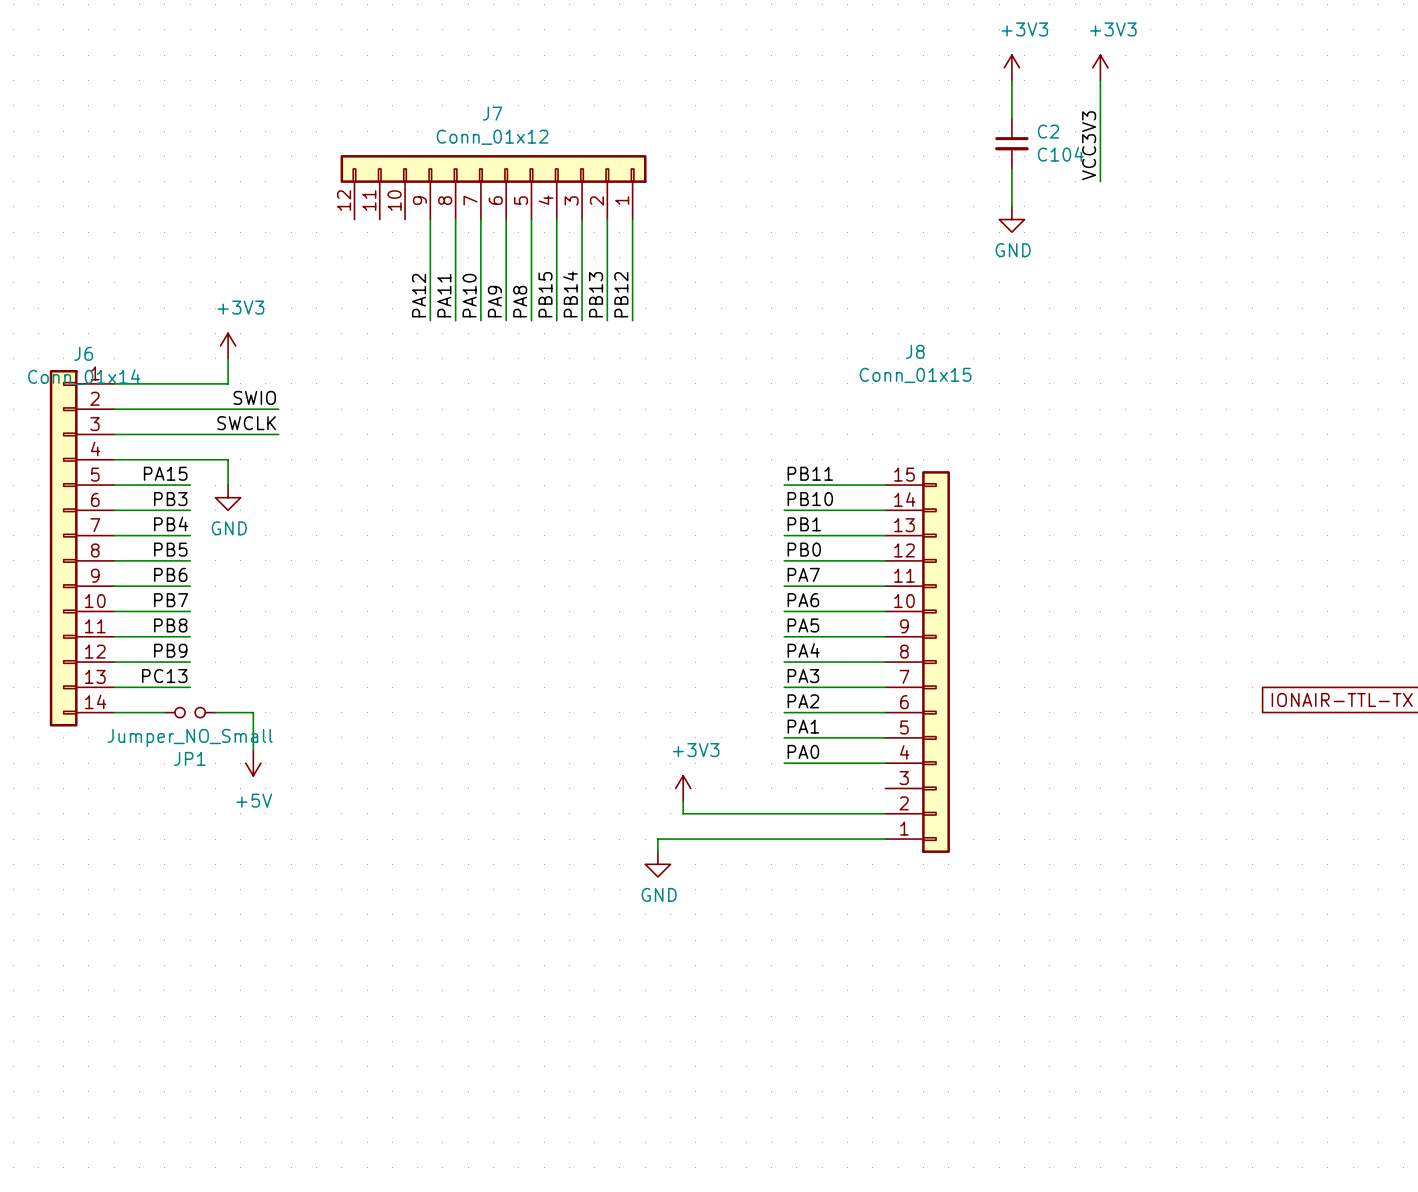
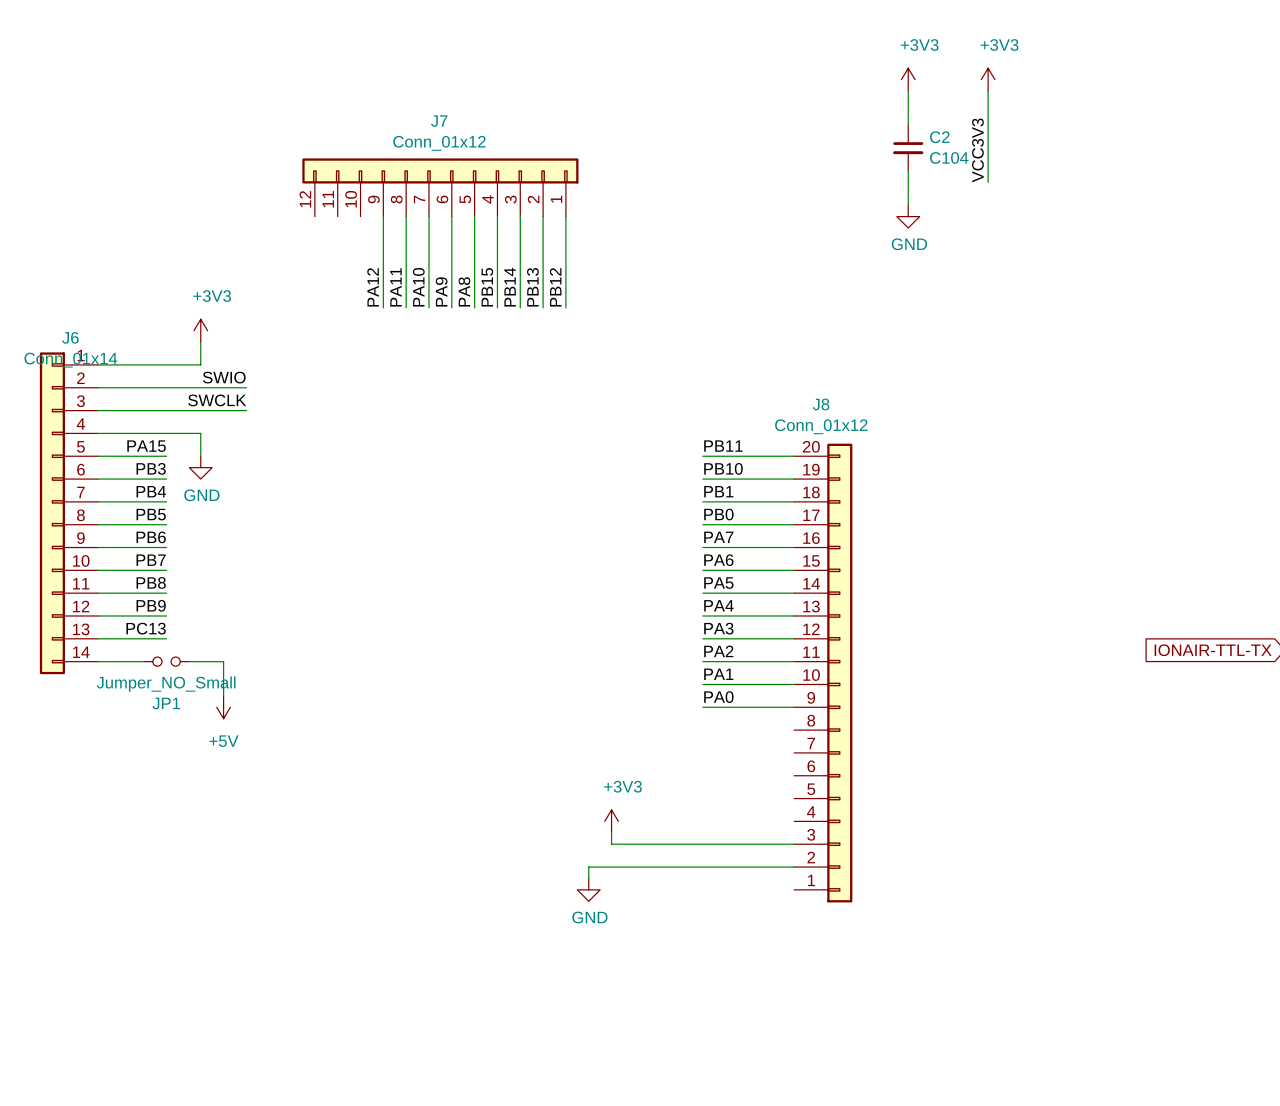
J8 value: Conn_01x15 (915, 375) -> Conn_01x12 (821, 426)
J8 symbol: [885, 471, 950, 853] -> [794, 443, 853, 903]
power symbol position: +3V3 (683, 788) -> +3V3 (611, 821)
wire: (683, 801) (683, 813) (885, 813) -> (611, 832) (611, 844) (794, 844)
wire: (885, 839) (657, 839) (657, 851) -> (794, 867) (588, 867) (588, 878)
power symbol position: GND (657, 864) -> GND (588, 889)

